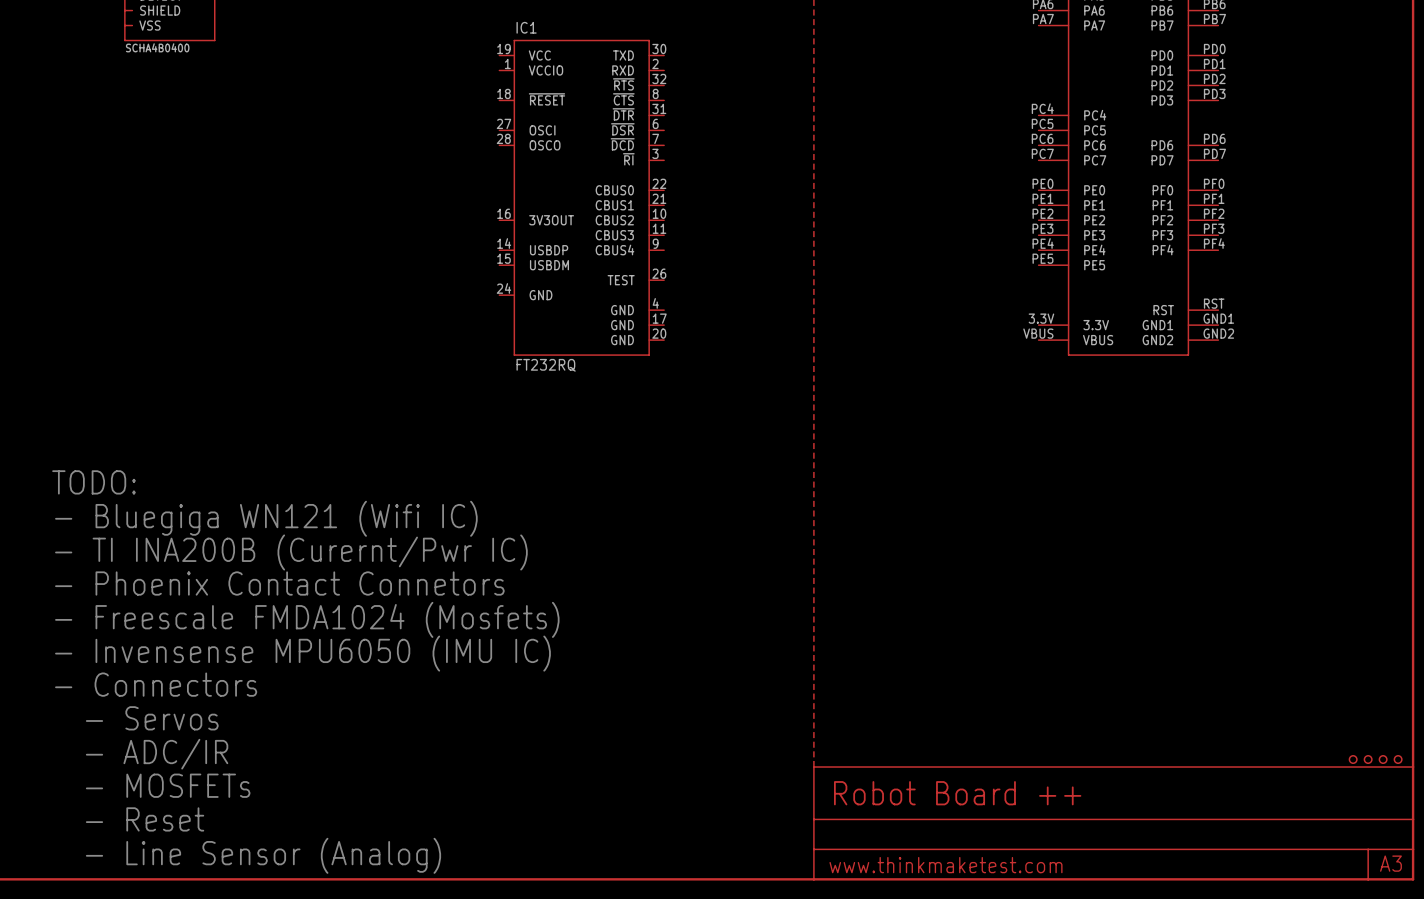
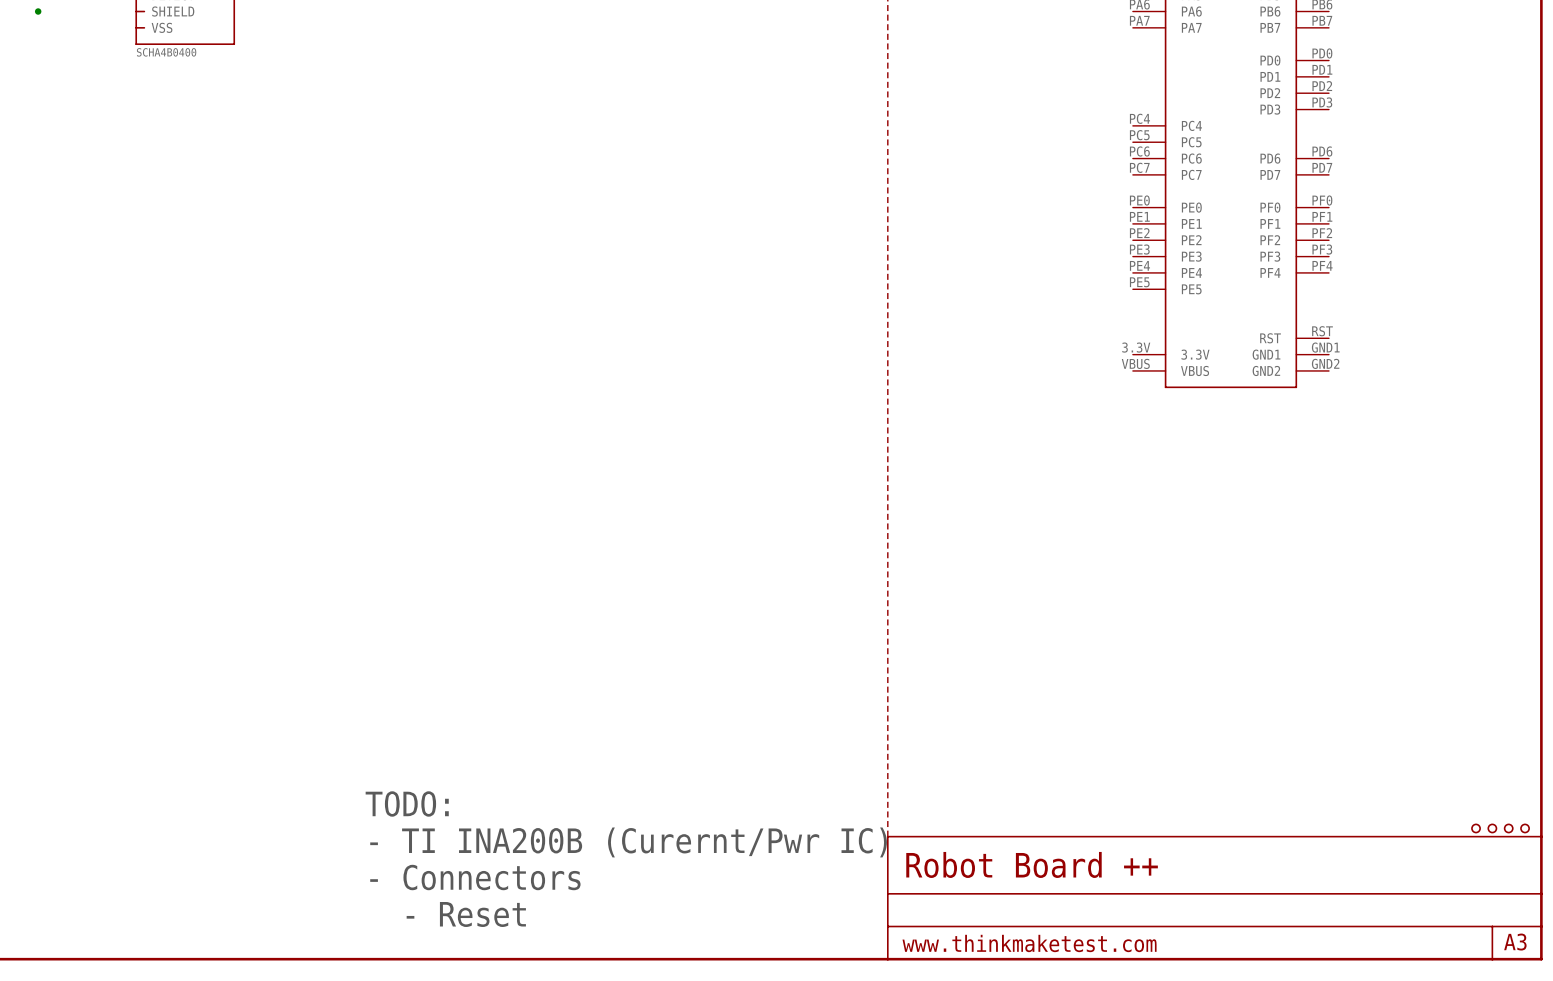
junction: none -> (38, 11)
IC1: FT232RQ (581, 197) -> none
text: TODO: (94, 482) -> none
text: - Bluegiga WN121 (Wifi IC) (266, 518) -> none
text: - TI INA200B (Curernt/Pwr IC) (291, 552) -> none
text: - Phoenix Contact Connetors (279, 583) -> none
text: - Freescale FMDA1024 (Mosfets) (307, 619) -> none
text: - Invensense MPU6050 (IMU IC) (302, 653) -> none
text: - Connectors (156, 684) -> none
text: - Servos (152, 718) -> none
text: none -> TODO: (407, 803)
text: - ADC/IR (157, 754) -> none
text: none -> - TI INA200B (Curernt/Pwr IC) (628, 842)
text: - MOSFETs (168, 785) -> none
text: none -> - Connectors (475, 877)
text: - Reset (145, 819) -> none
text: none -> - Reset (466, 914)
text: - Line Sensor (Analog) (263, 855) -> none

